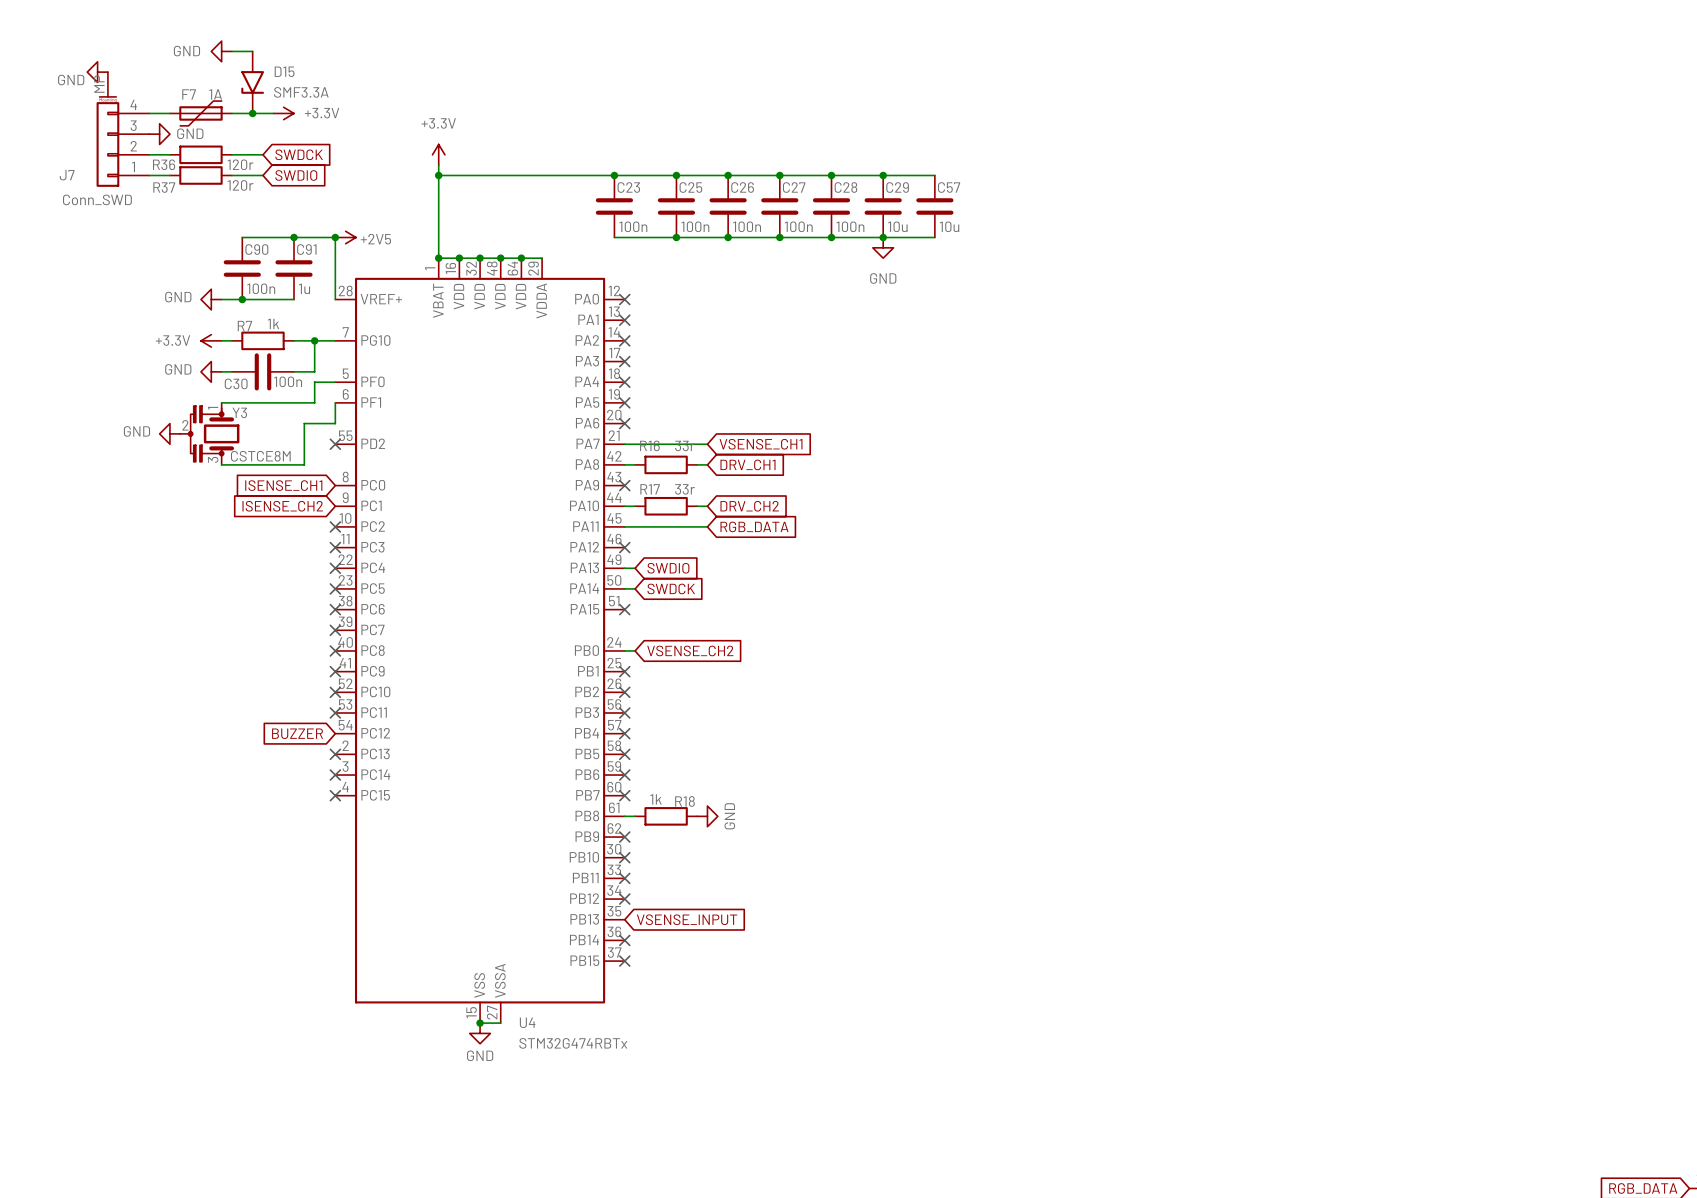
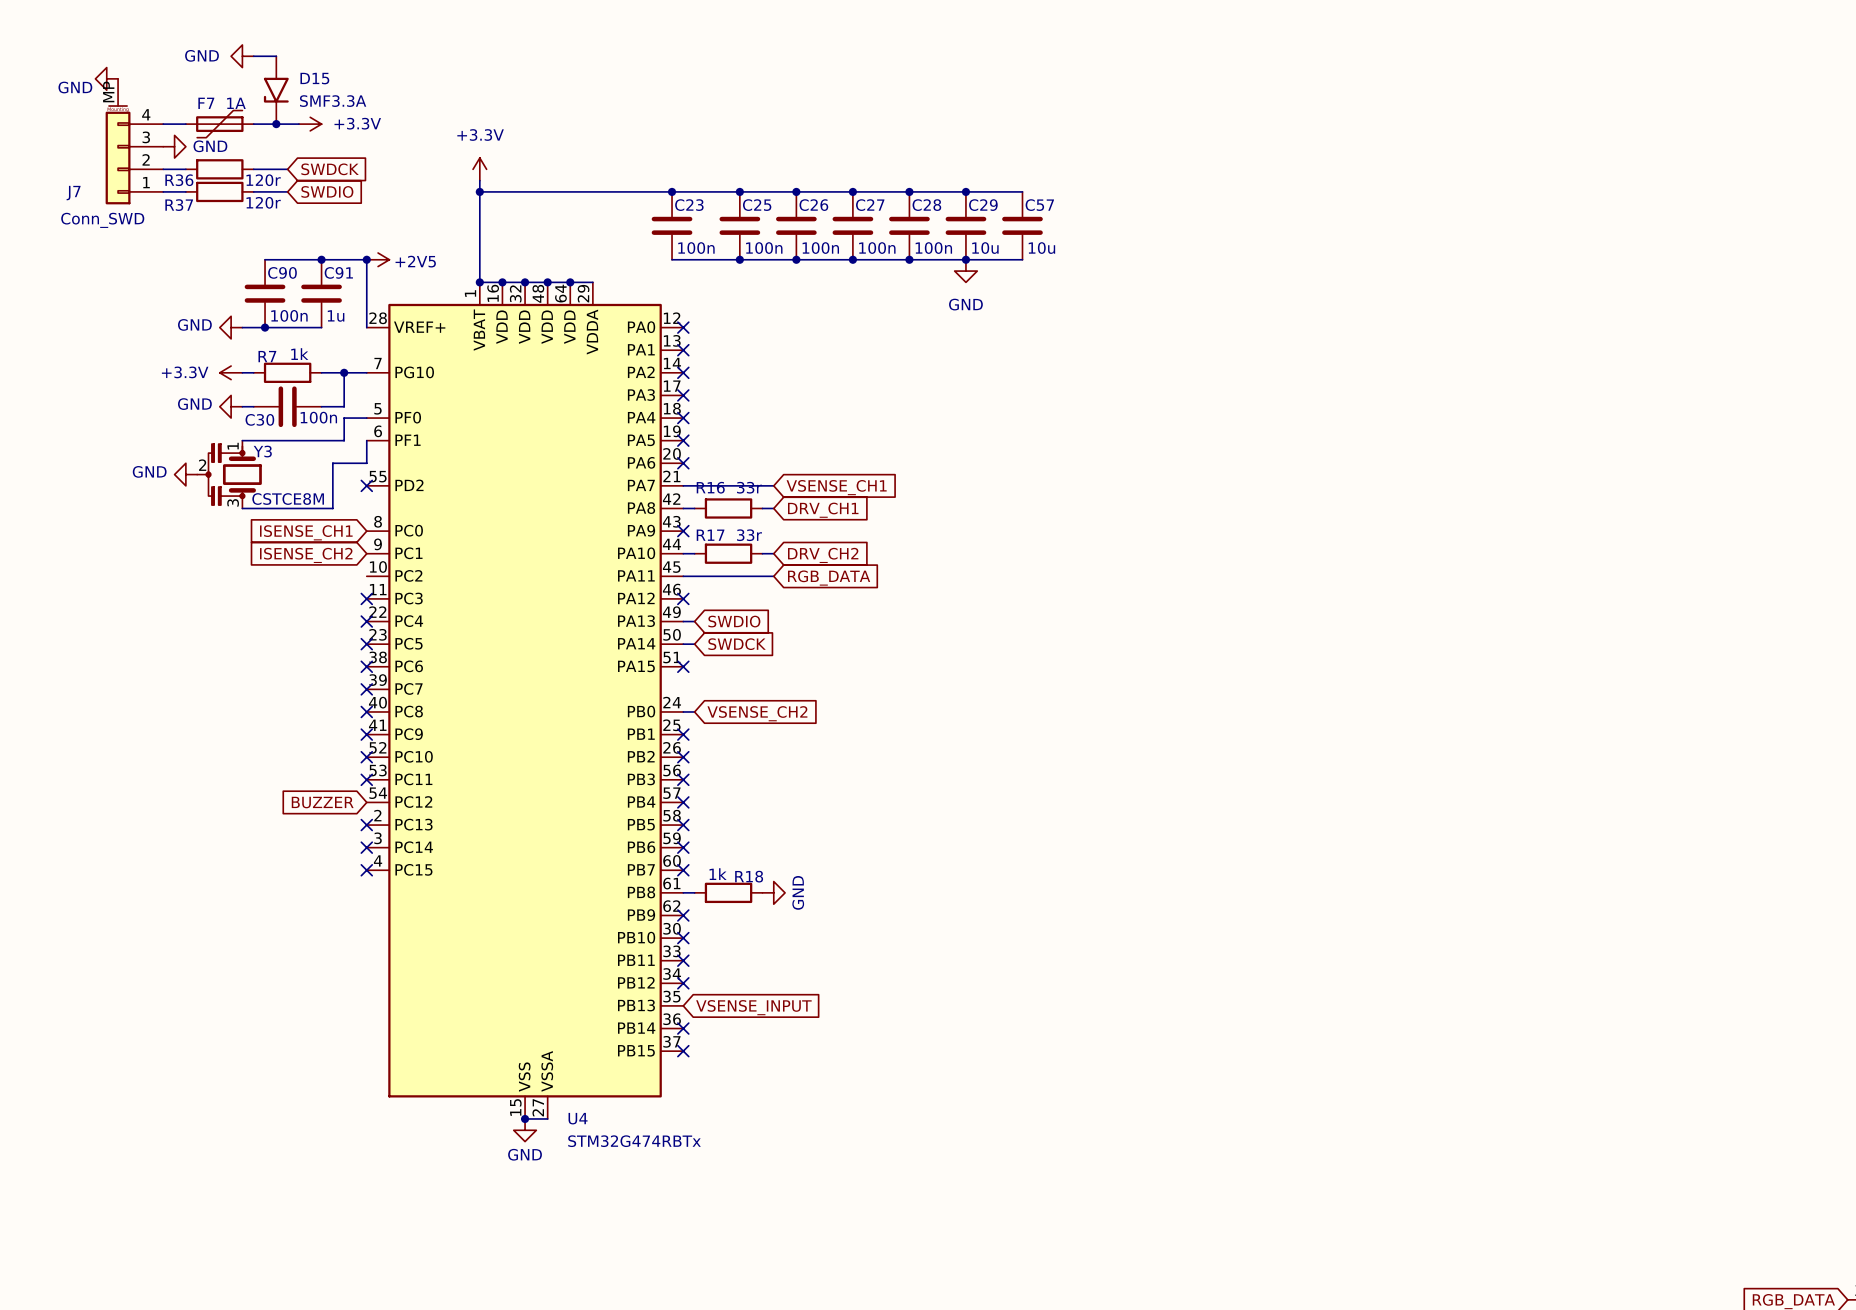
no-connect mark: (335, 526) -> none

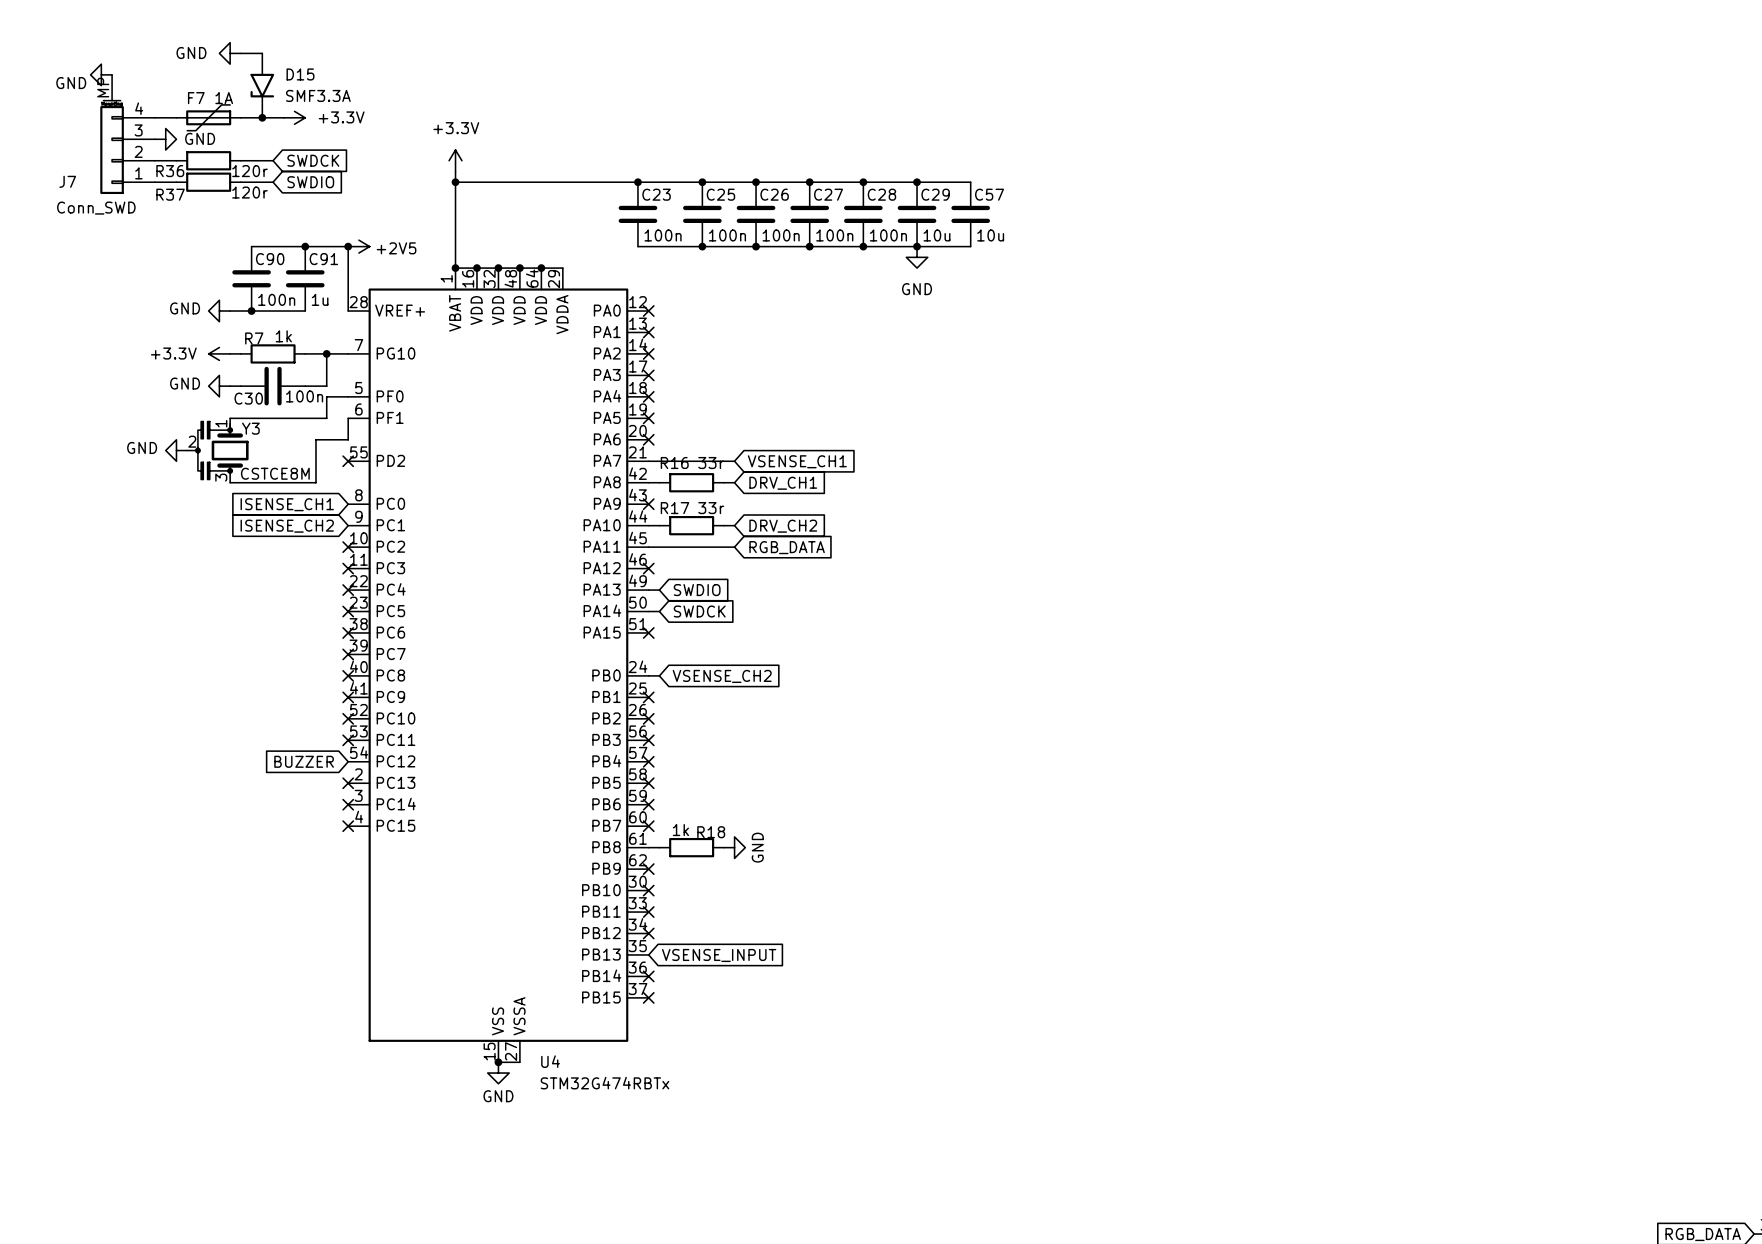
no-connect mark: none -> (348, 547)

